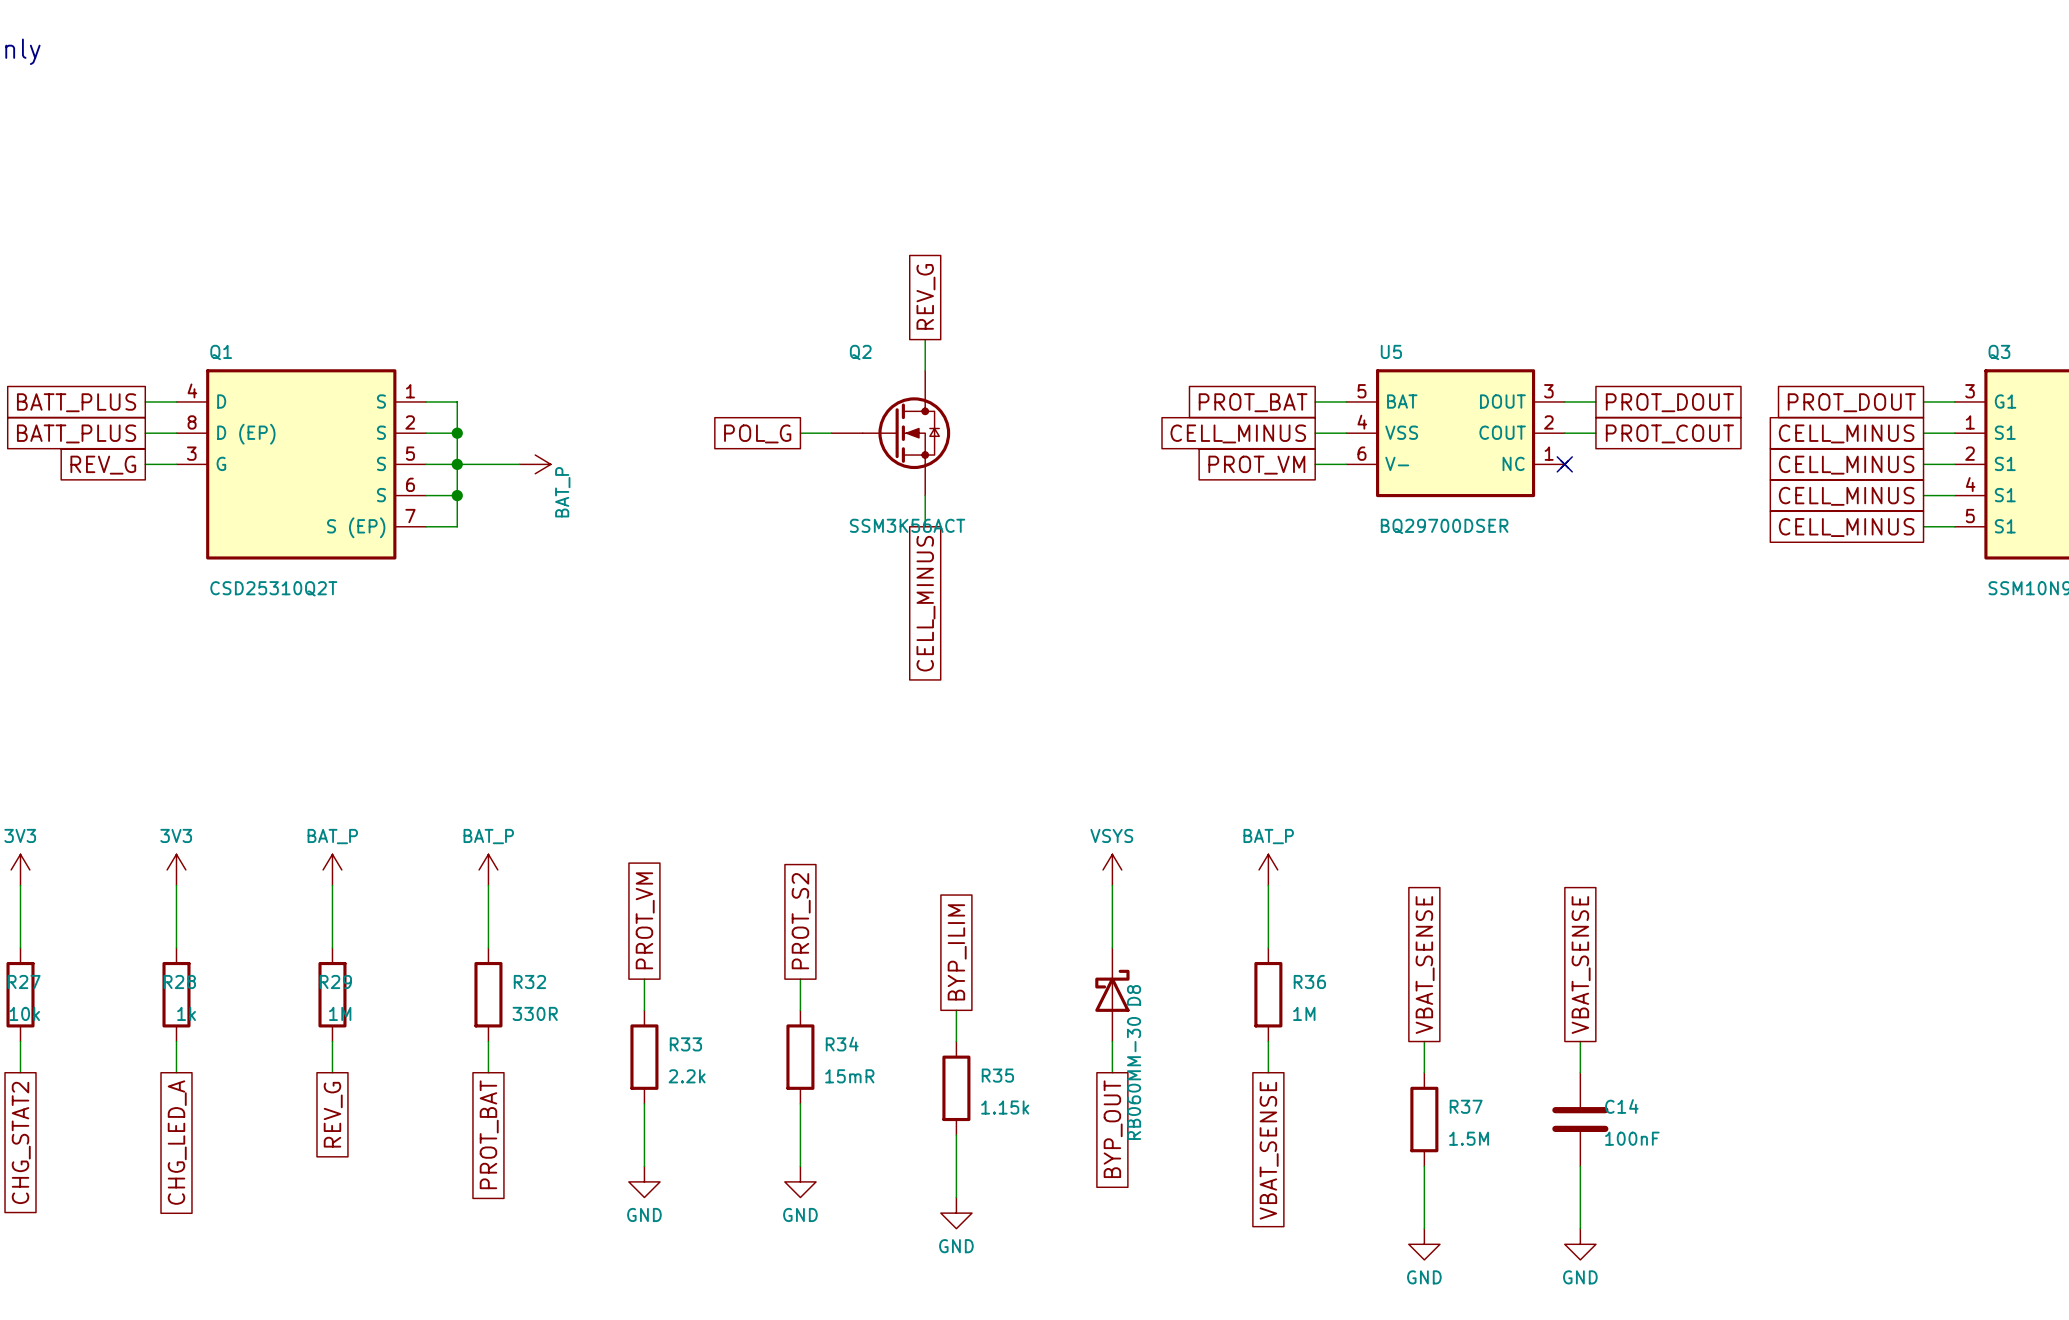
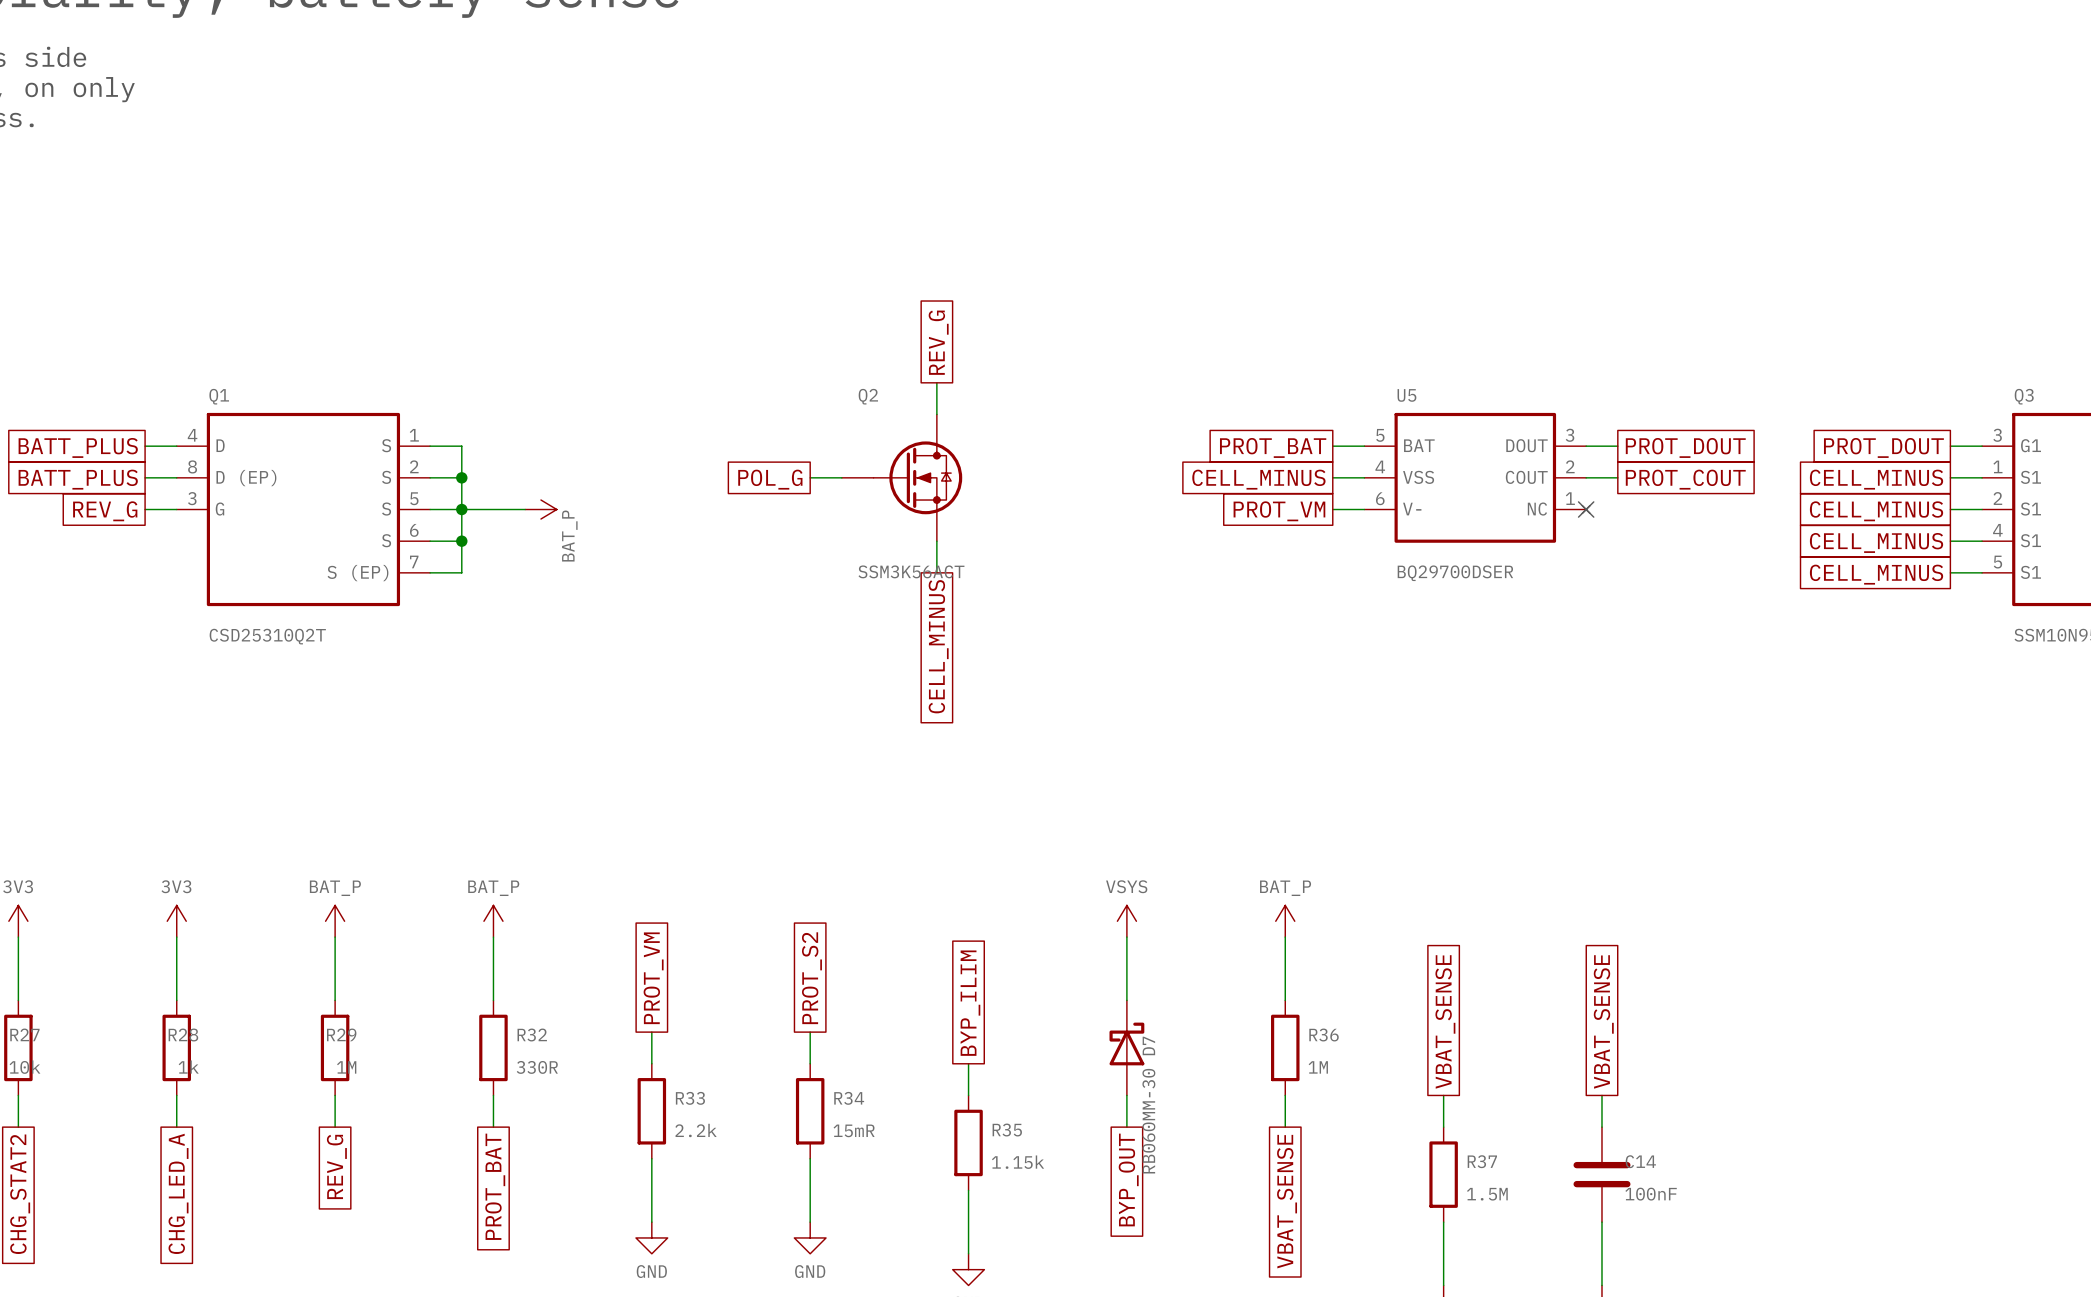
D8 name: D8 (1134, 995) -> D7 (1148, 1045)

